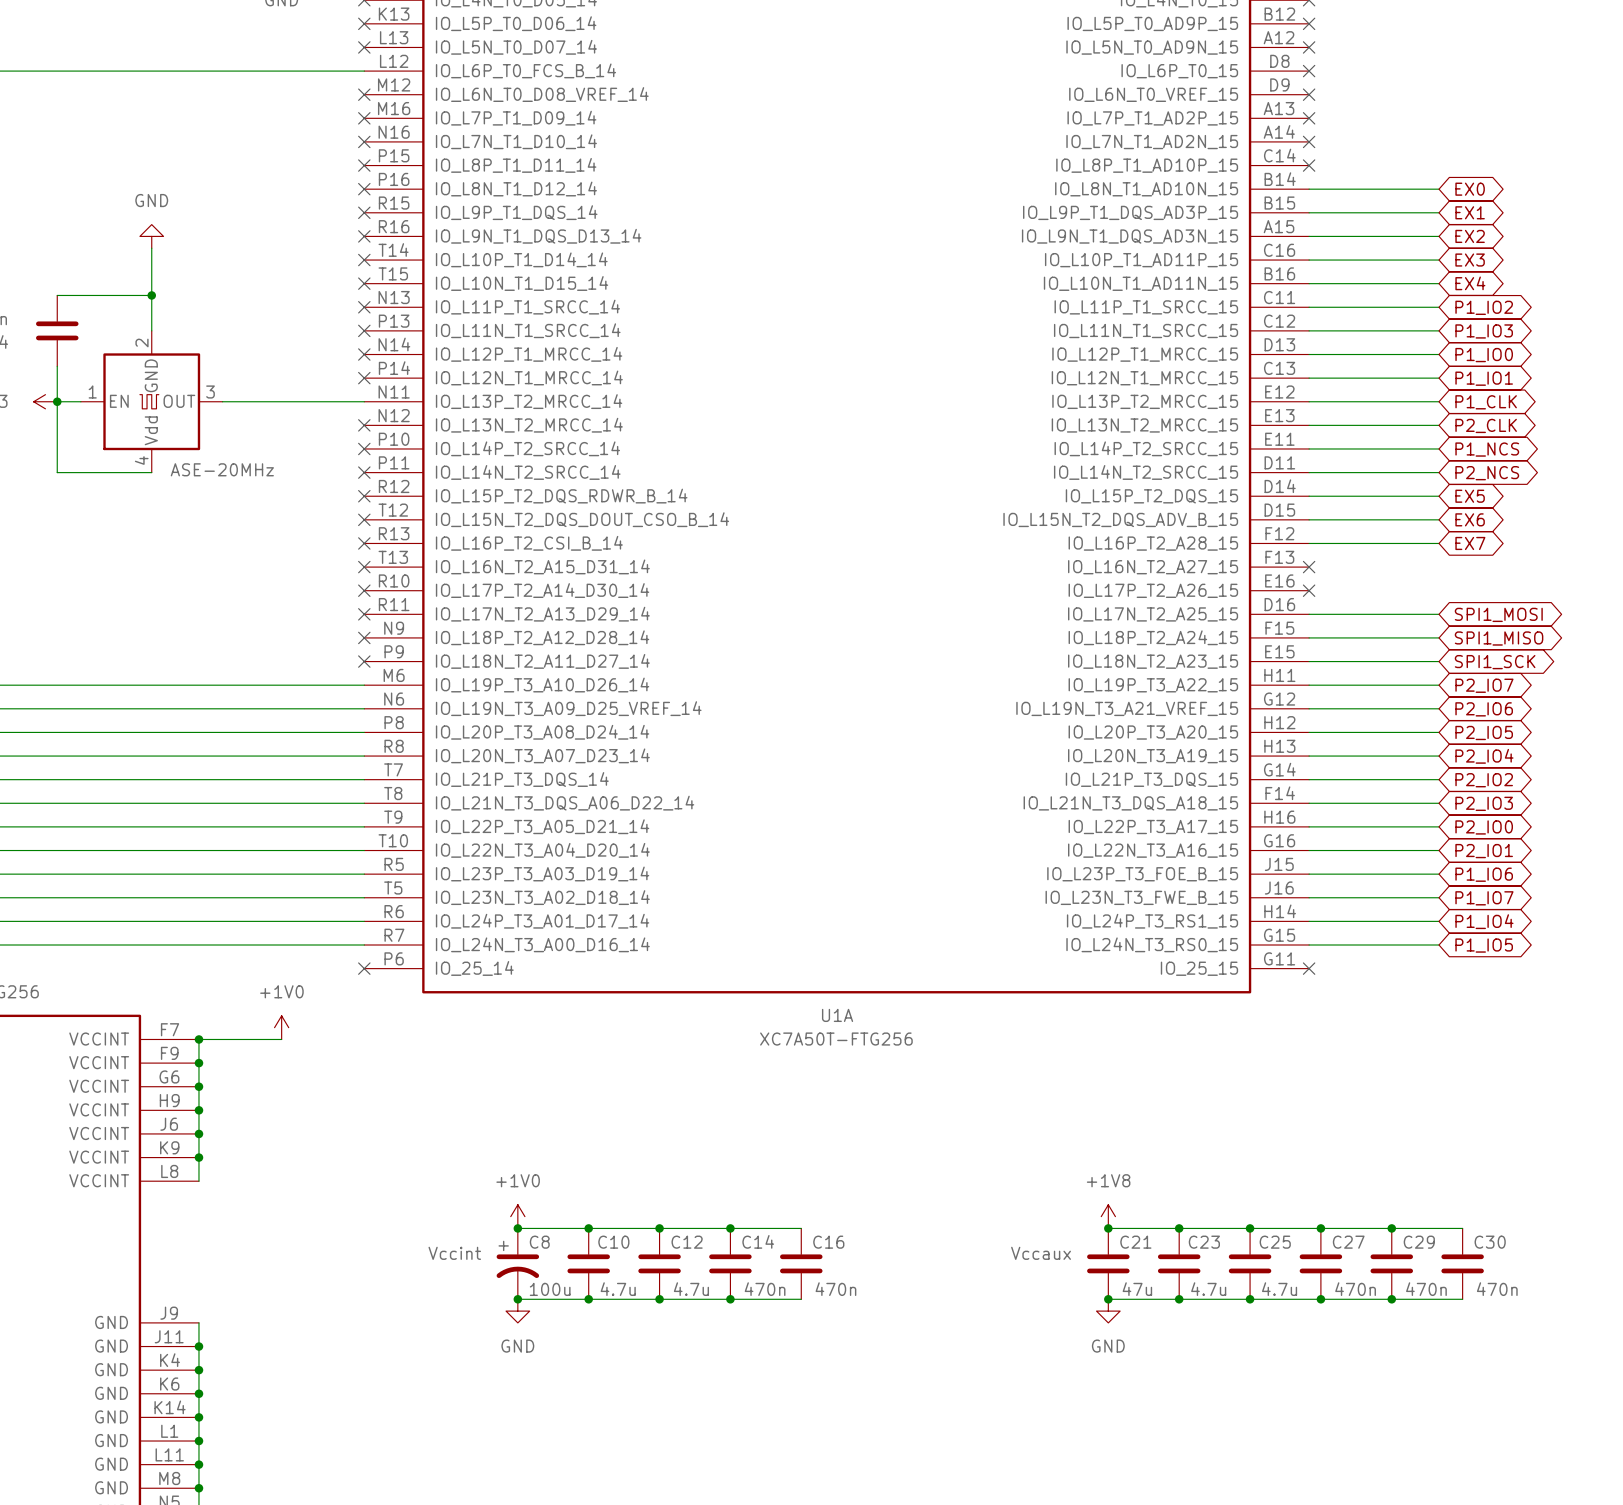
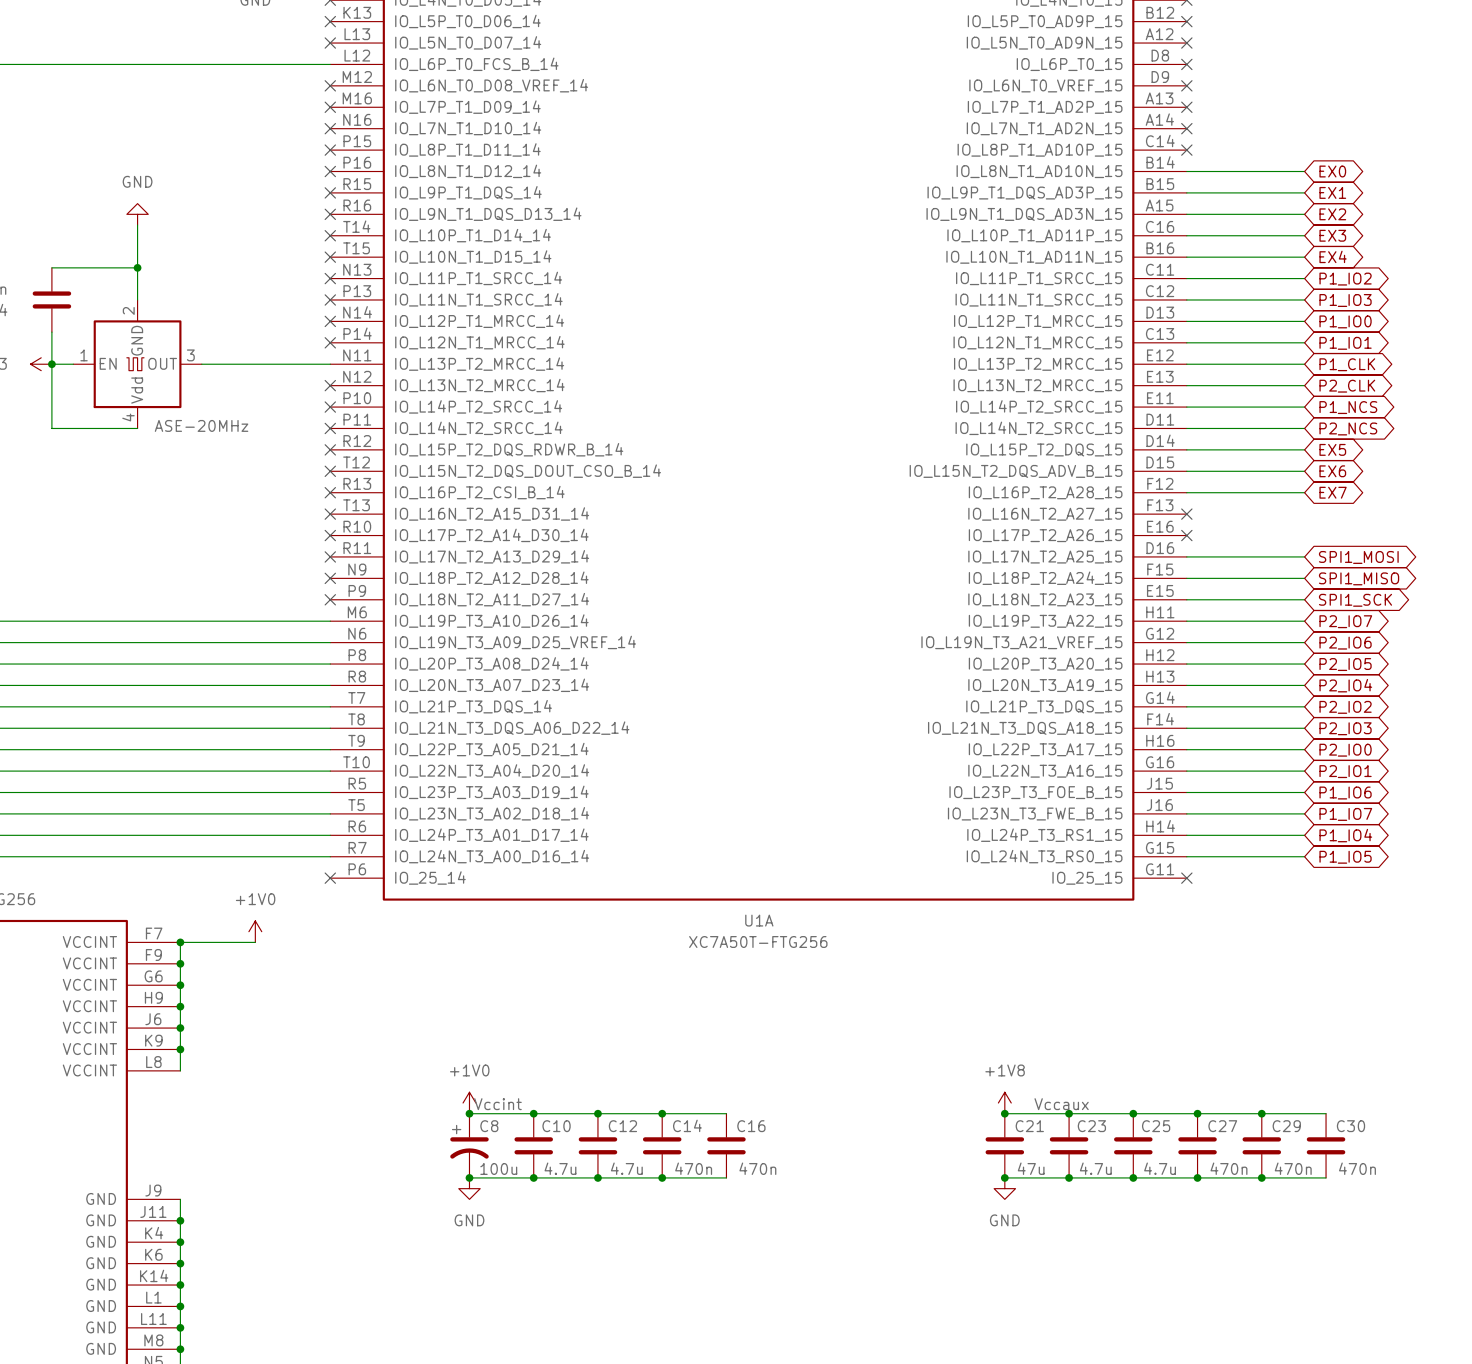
label position: Vccint (454, 1253) -> Vccint (497, 1104)
label position: Vccaux (1041, 1253) -> Vccaux (1061, 1104)

